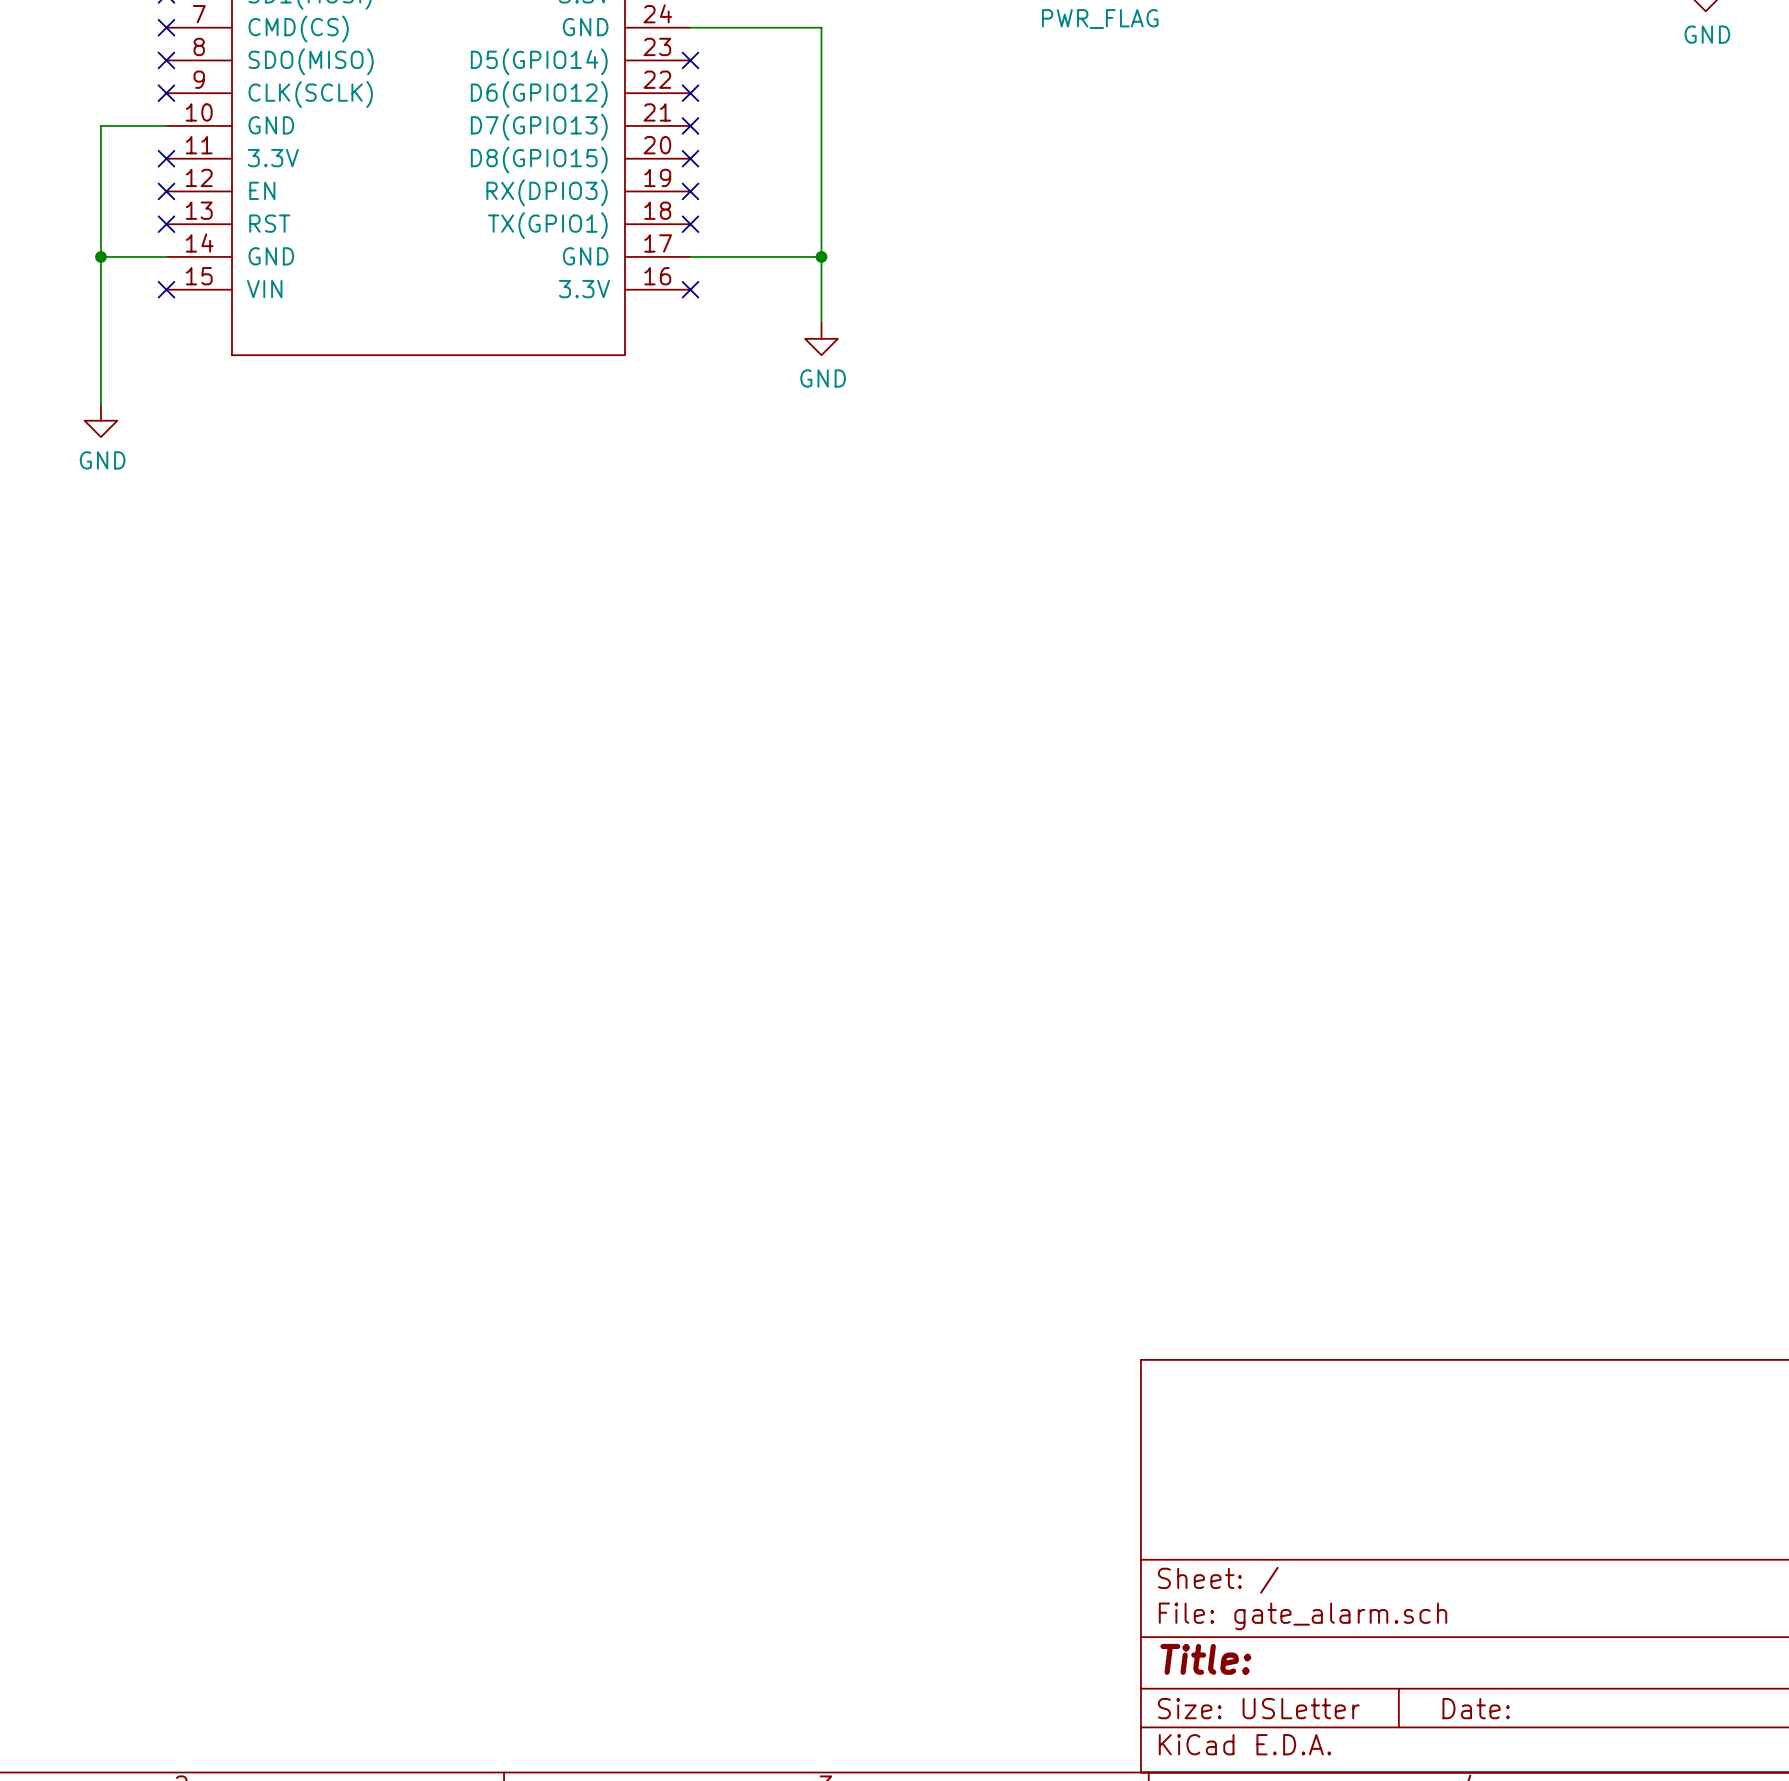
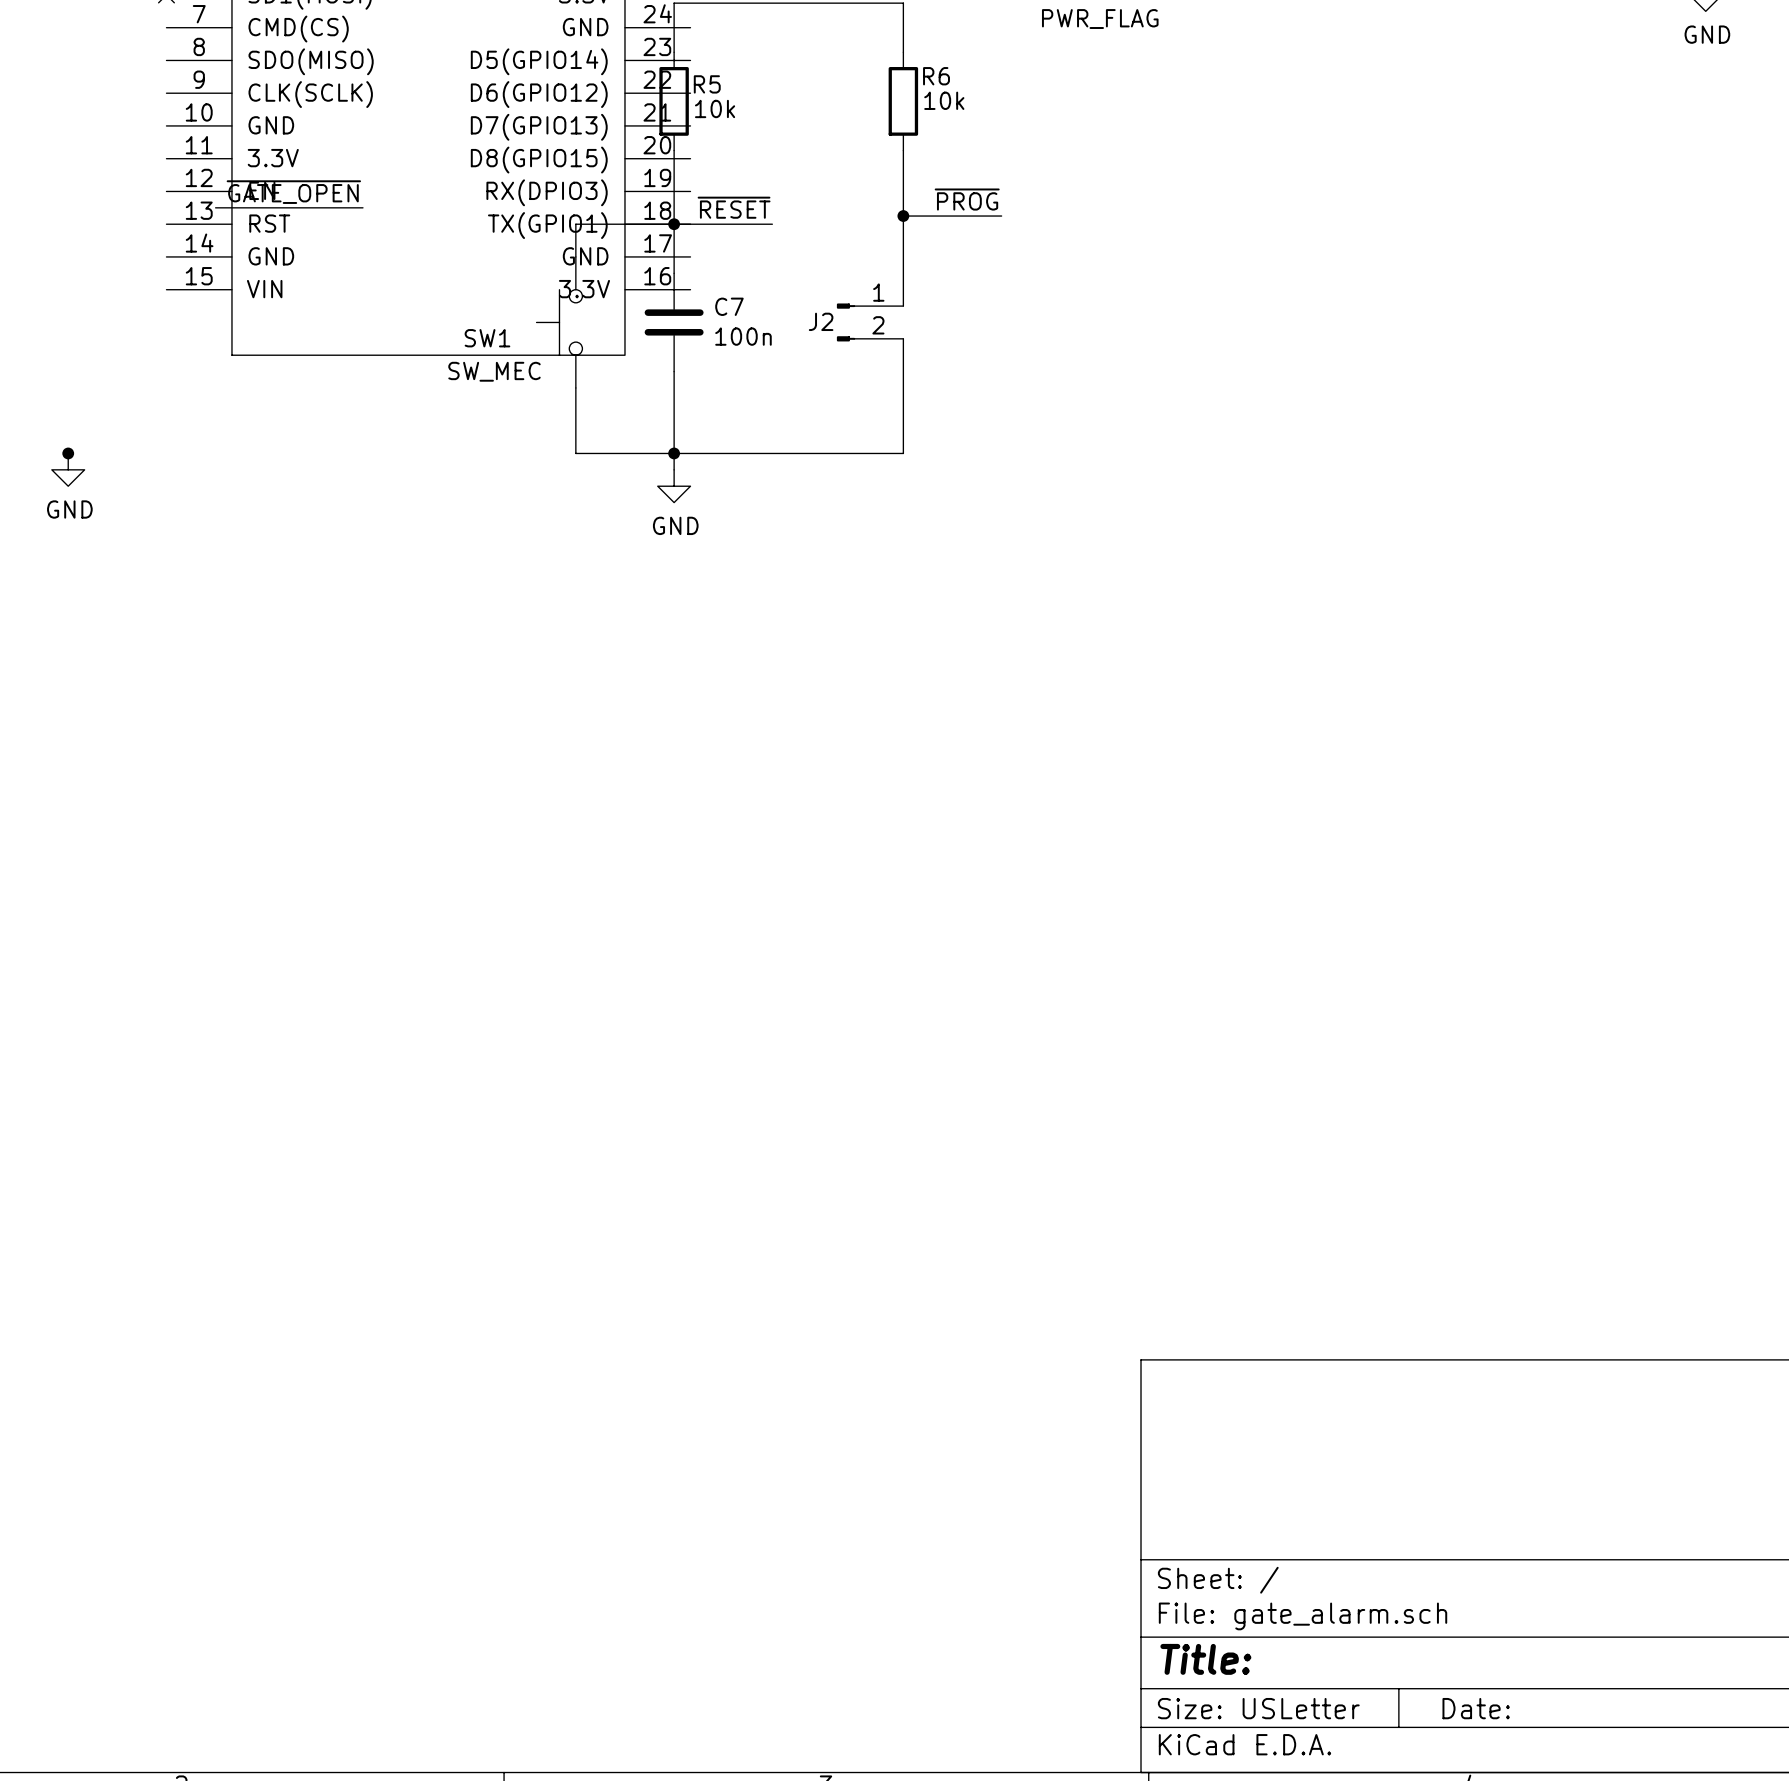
no-connect mark: (166, 27) -> none
wire: (690, 27) (821, 27) (821, 322) -> none
wire: none -> (674, 52) (674, 3) (903, 3) (903, 52)
no-connect mark: (166, 60) -> none
no-connect mark: (690, 60) -> none
no-connect mark: (166, 93) -> none
no-connect mark: (690, 93) -> none
R5: none -> 10k (674, 101)
R6: none -> 10k (903, 101)
wire: (166, 125) (100, 125) (100, 404) -> none
no-connect mark: (690, 125) -> none
wire: none -> (674, 150) (674, 273)
wire: none -> (903, 150) (903, 306)
no-connect mark: (166, 158) -> none
no-connect mark: (690, 158) -> none
no-connect mark: (166, 191) -> none
no-connect mark: (690, 191) -> none
label: none -> ~{GATE_OPEN} (293, 192)
label: none -> ~{PROG} (967, 199)
wire: none -> (215, 207) (362, 207)
label: none -> ~{RESET} (734, 207)
wire: none -> (903, 216) (1001, 216)
junction: none -> (903, 216)
no-connect mark: (166, 224) -> none
junction: none -> (674, 224)
no-connect mark: (690, 224) -> none
wire: none -> (772, 224) (575, 224) (575, 256)
wire: (100, 256) (166, 256) -> none
junction: (100, 256) -> none
wire: (690, 256) (821, 256) -> none
junction: (821, 256) -> none
no-connect mark: (166, 289) -> none
no-connect mark: (690, 289) -> none
SW1: none -> SW_MEC (559, 322)
C7: none -> 100n (674, 322)
J2: none -> (870, 322)
power symbol position: GND (821, 338) -> GND (674, 486)
wire: none -> (903, 338) (903, 453) (575, 453) (575, 387)
wire: none -> (674, 371) (674, 469)
power symbol position: GND (100, 420) -> GND (68, 469)
junction: none -> (68, 453)
junction: none -> (674, 453)

